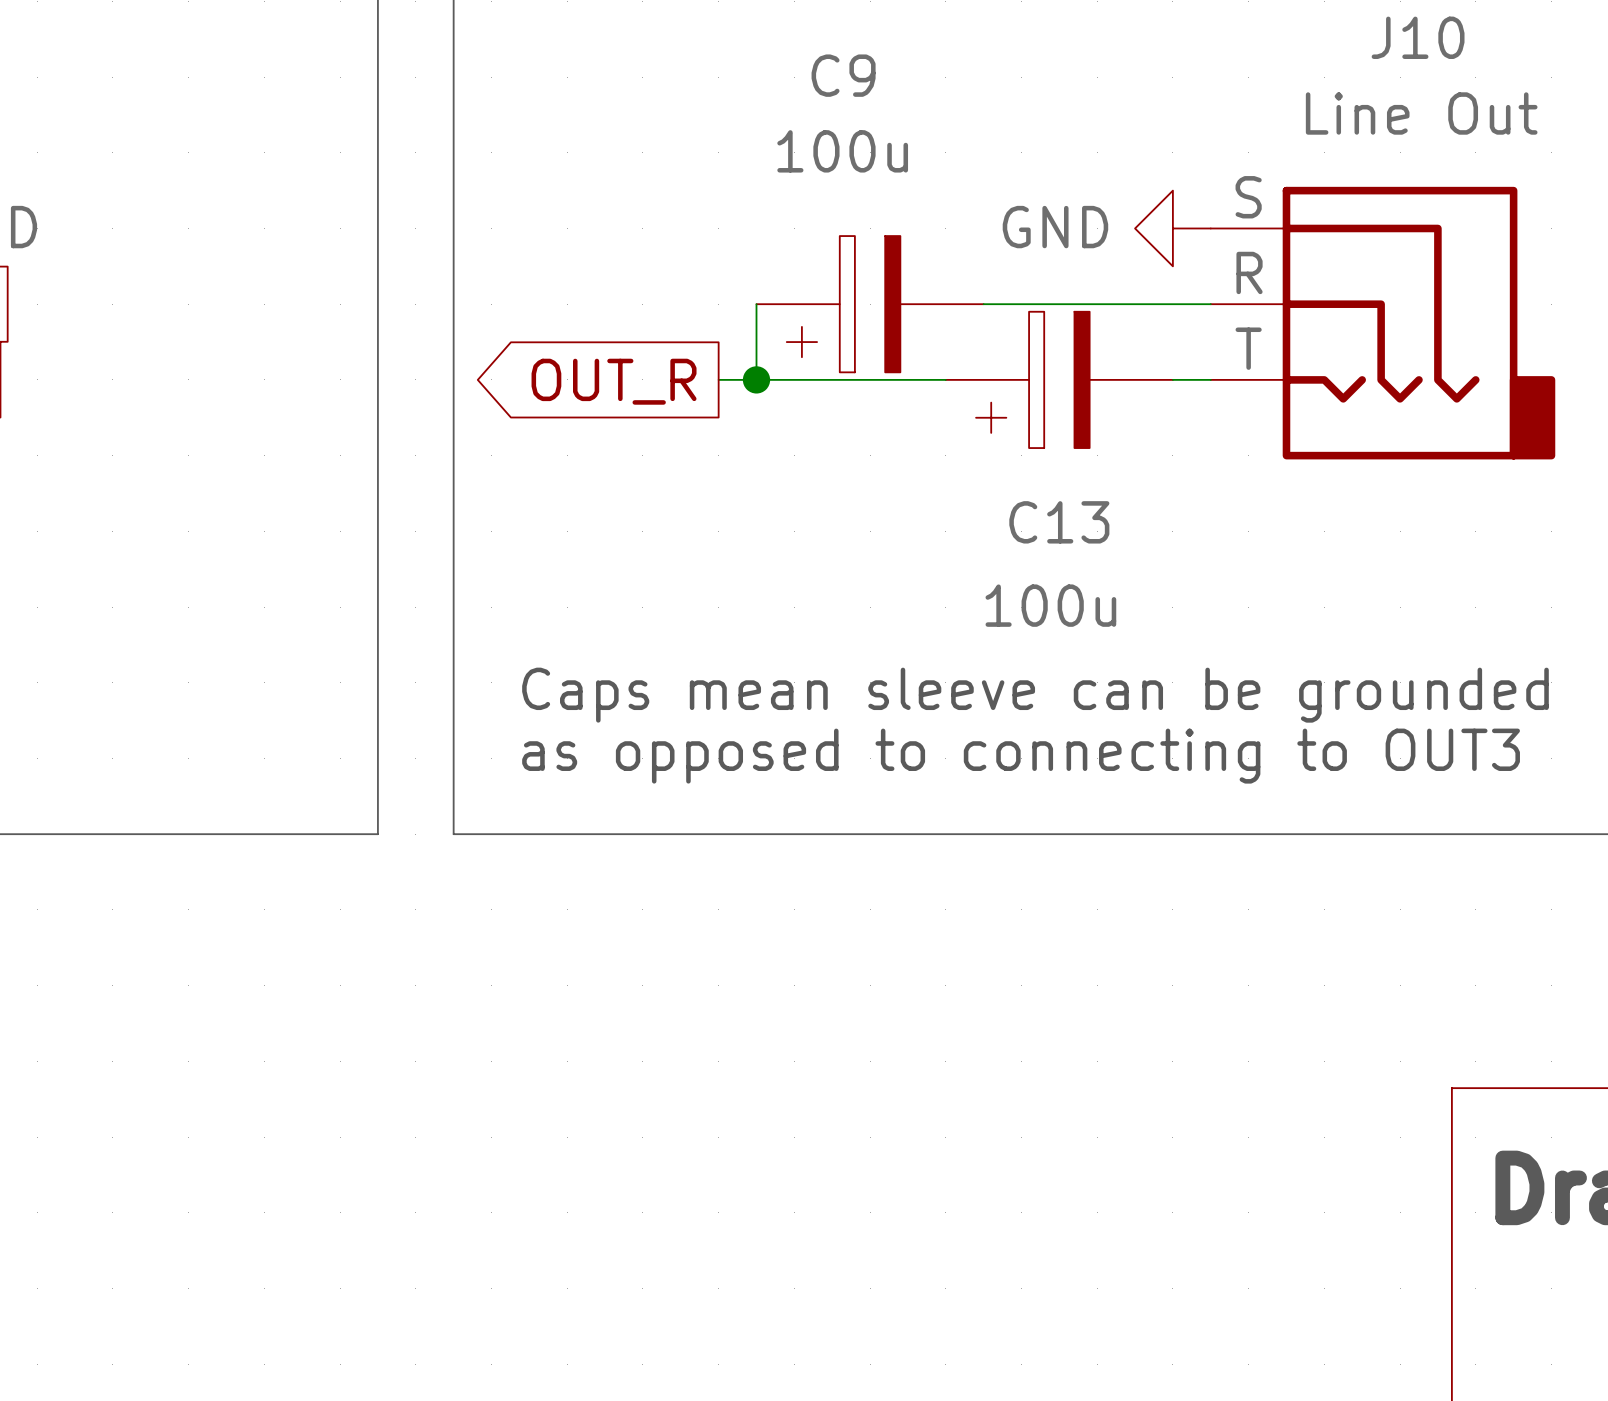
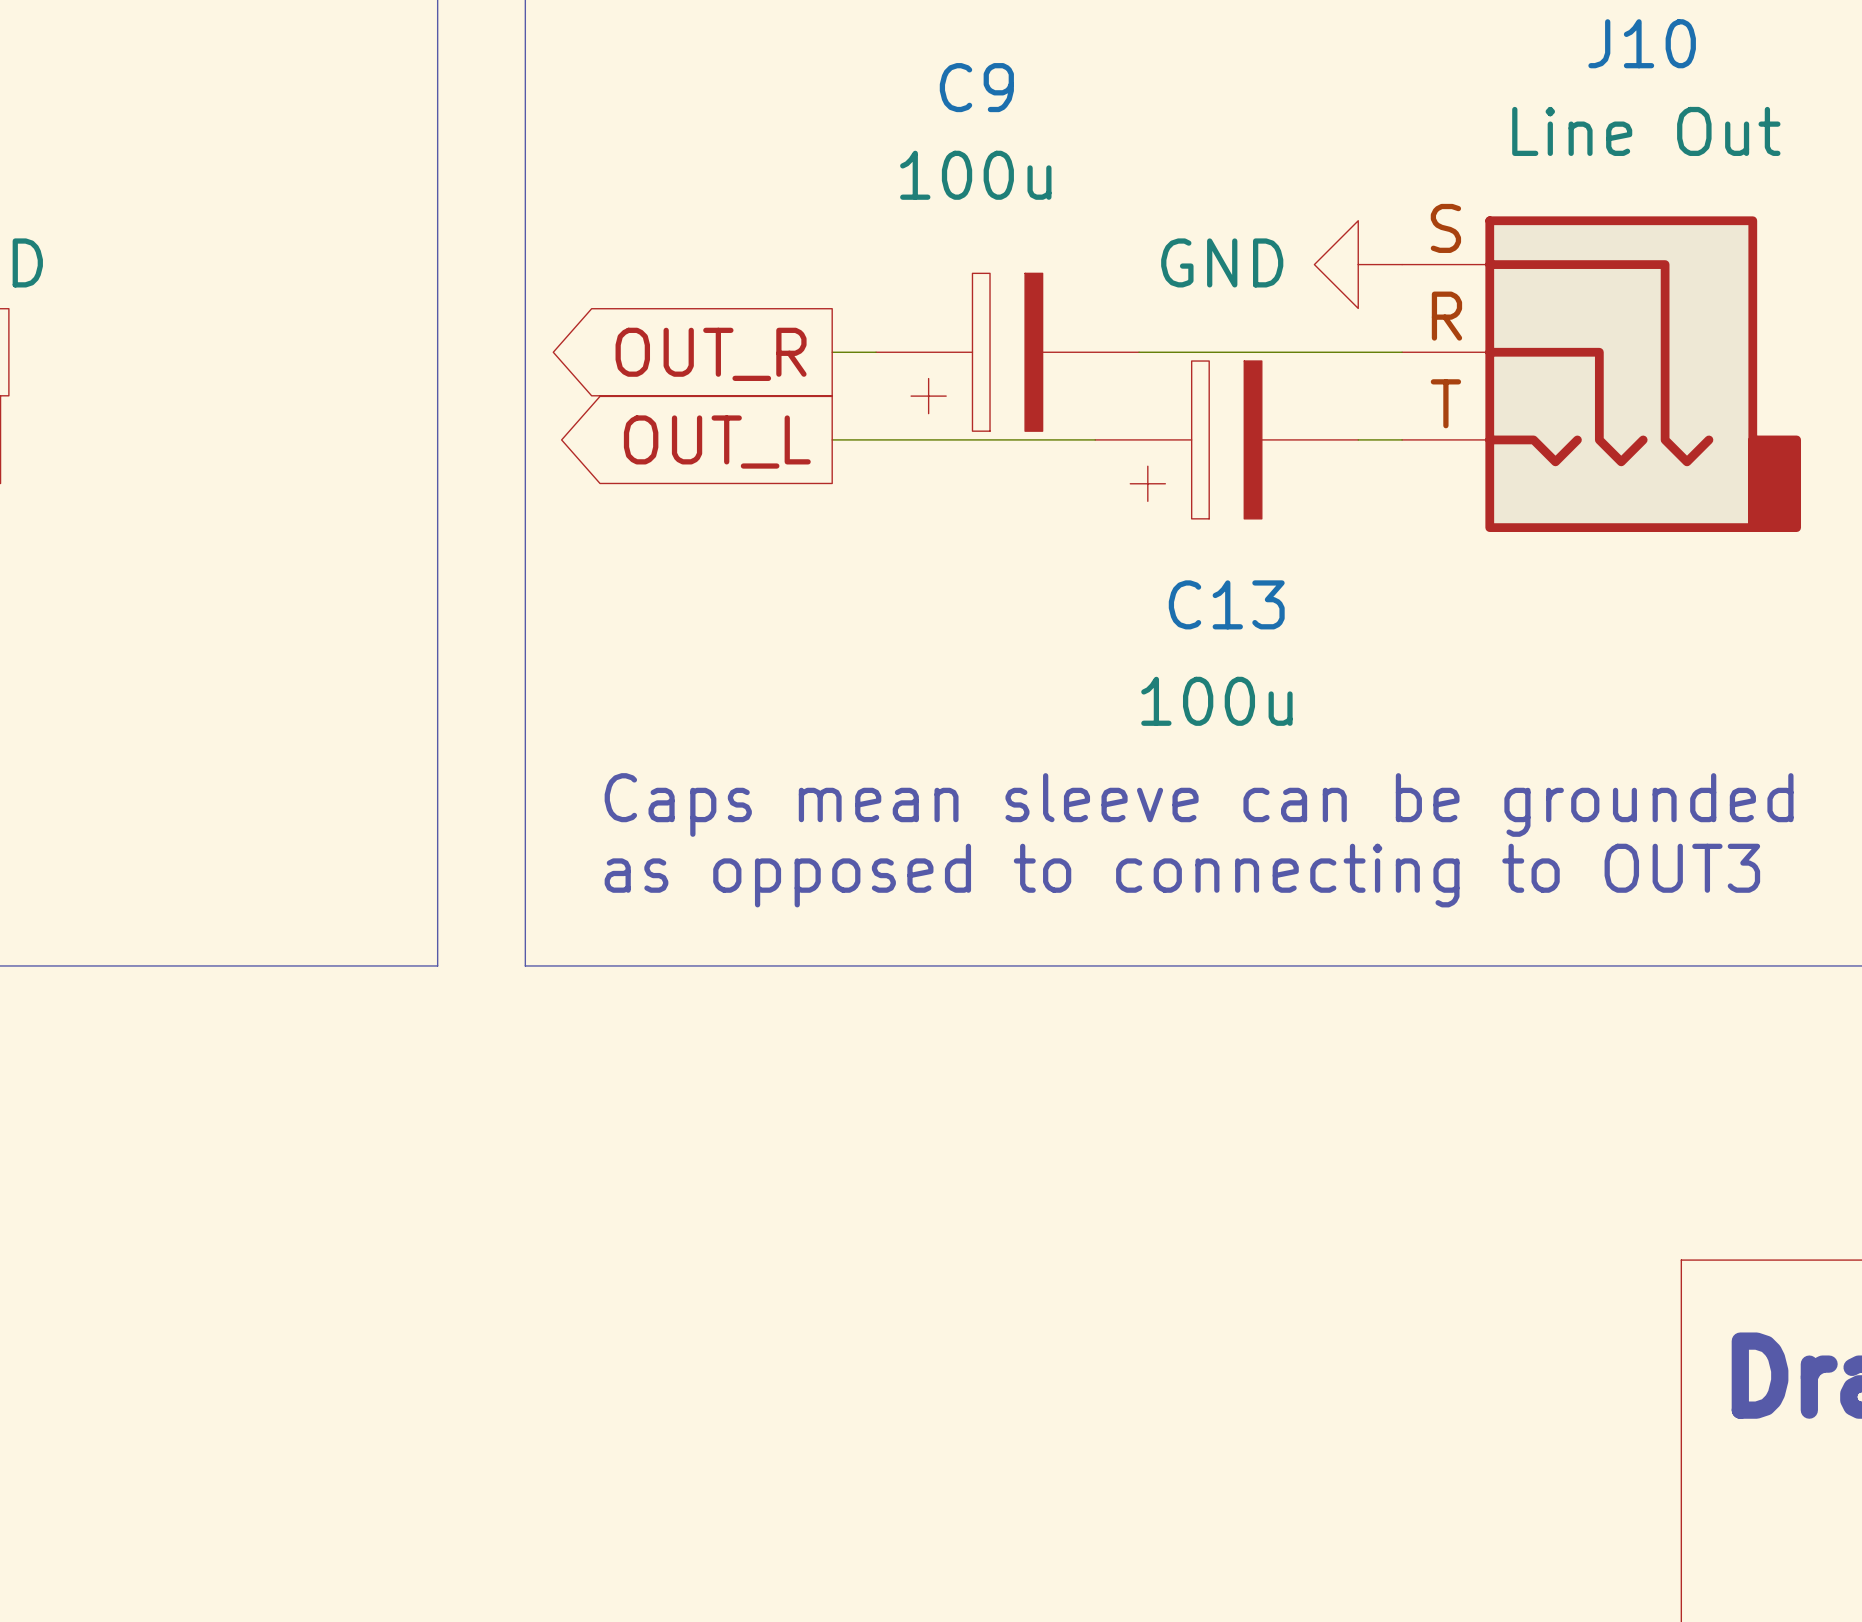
wire: (756, 304) (756, 379) -> (876, 352) (832, 352)
global label: none -> OUT_R (711, 354)
junction: (756, 379) -> none
global label: OUT_R (614, 381) -> OUT_L (717, 442)

